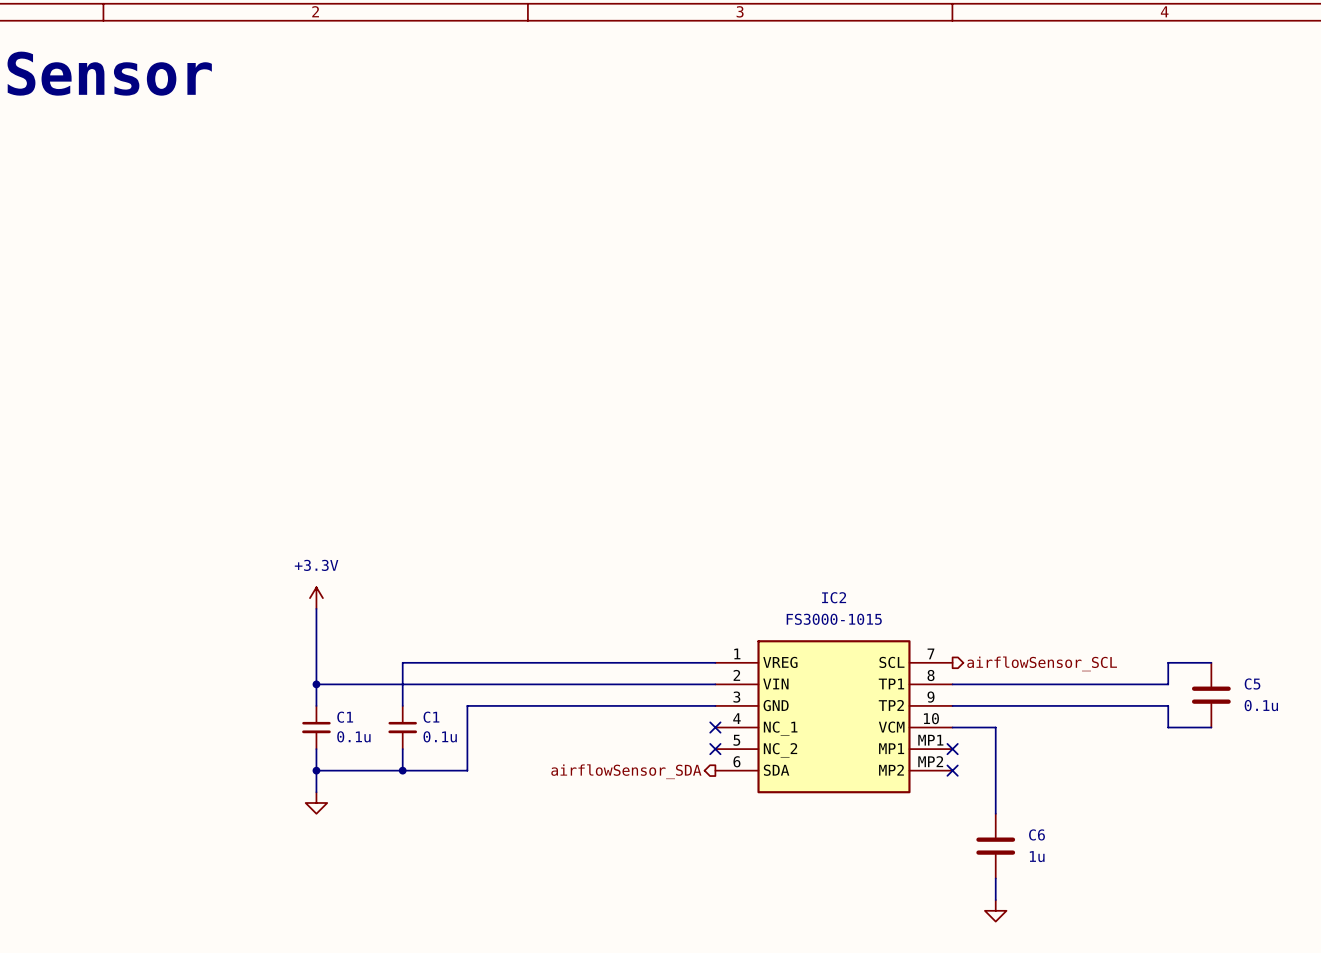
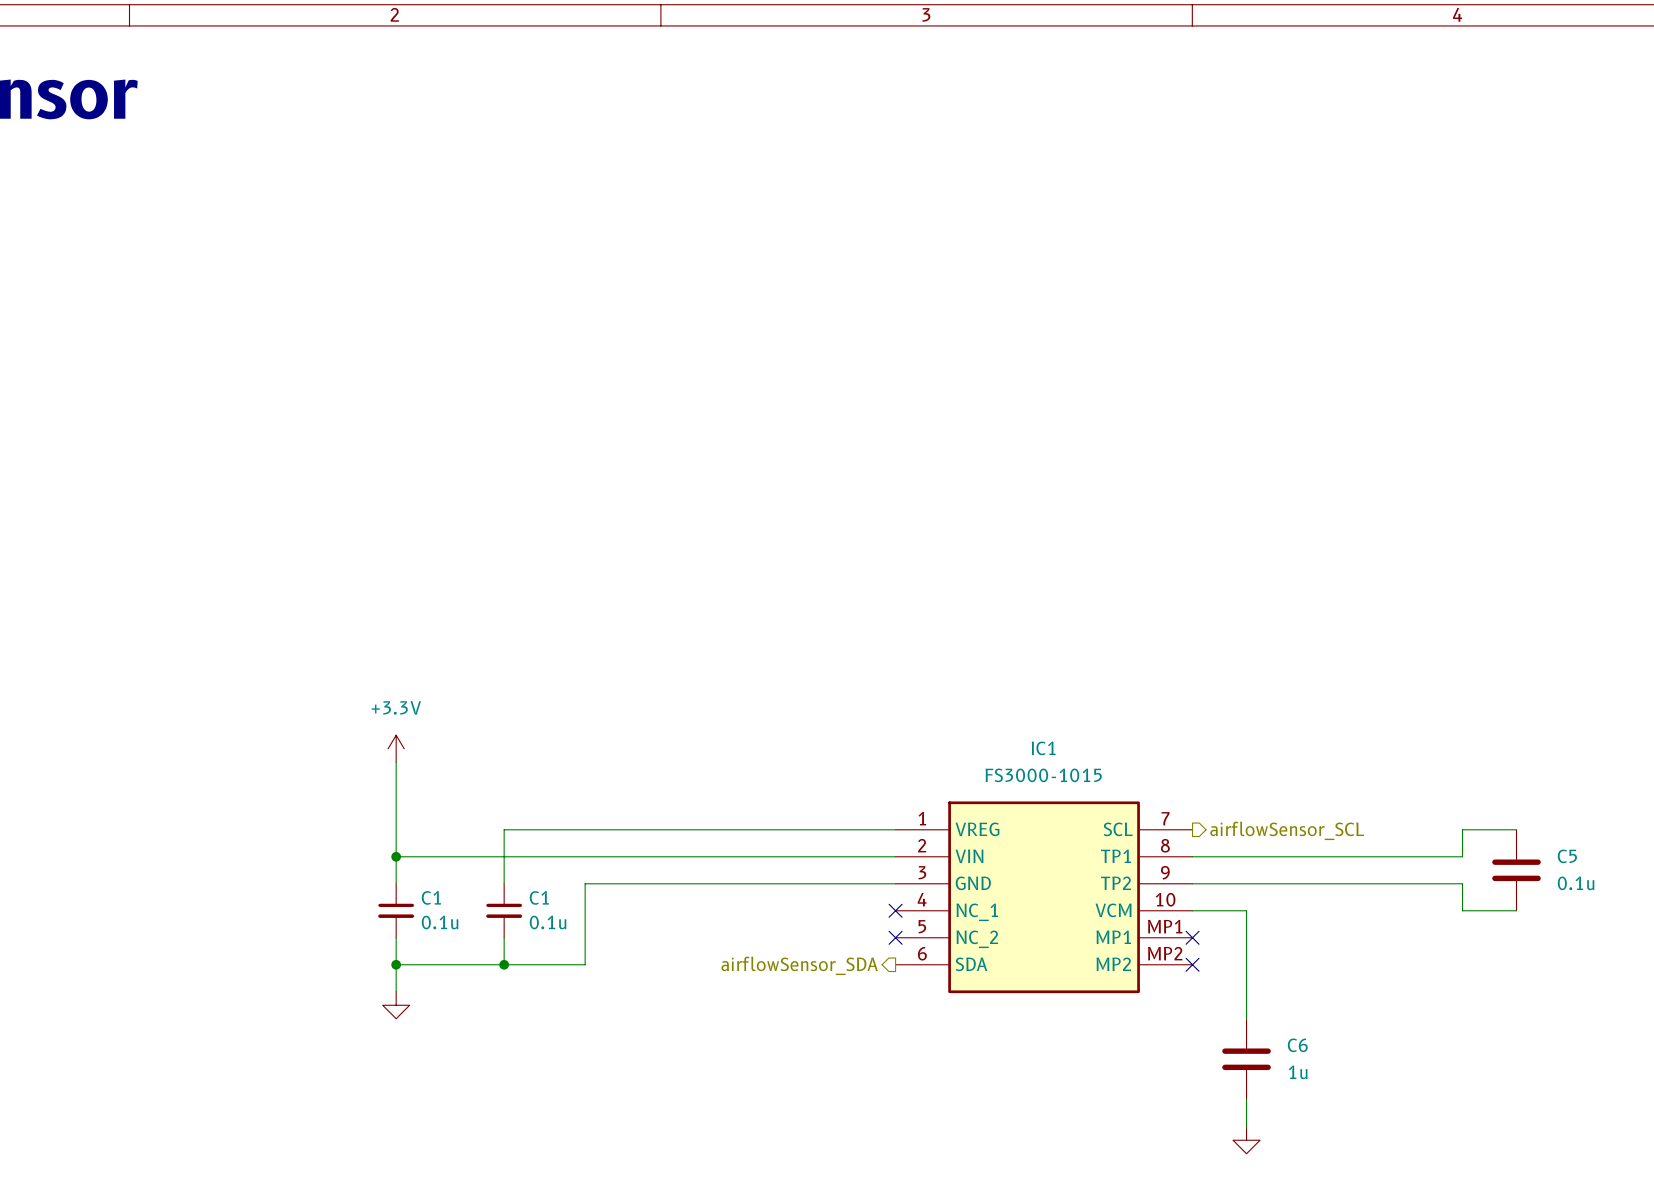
IC2 name: IC2 (834, 597) -> IC1 (1043, 748)

